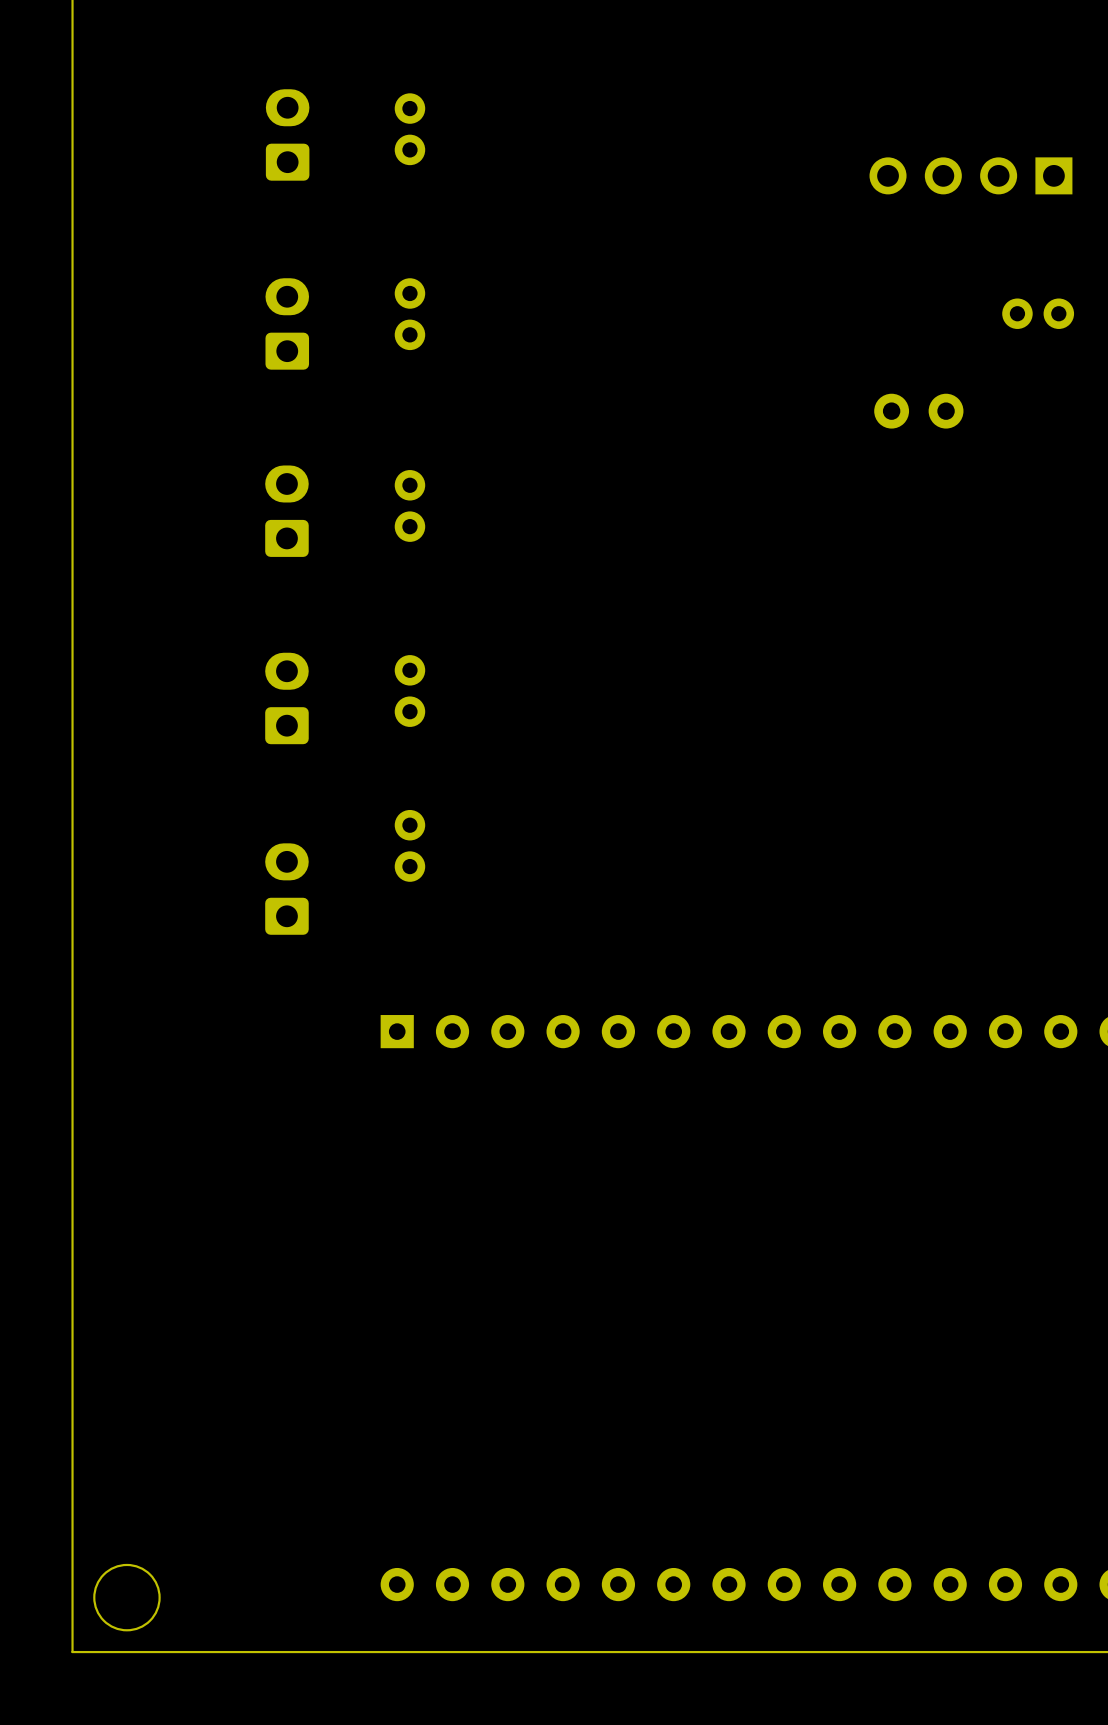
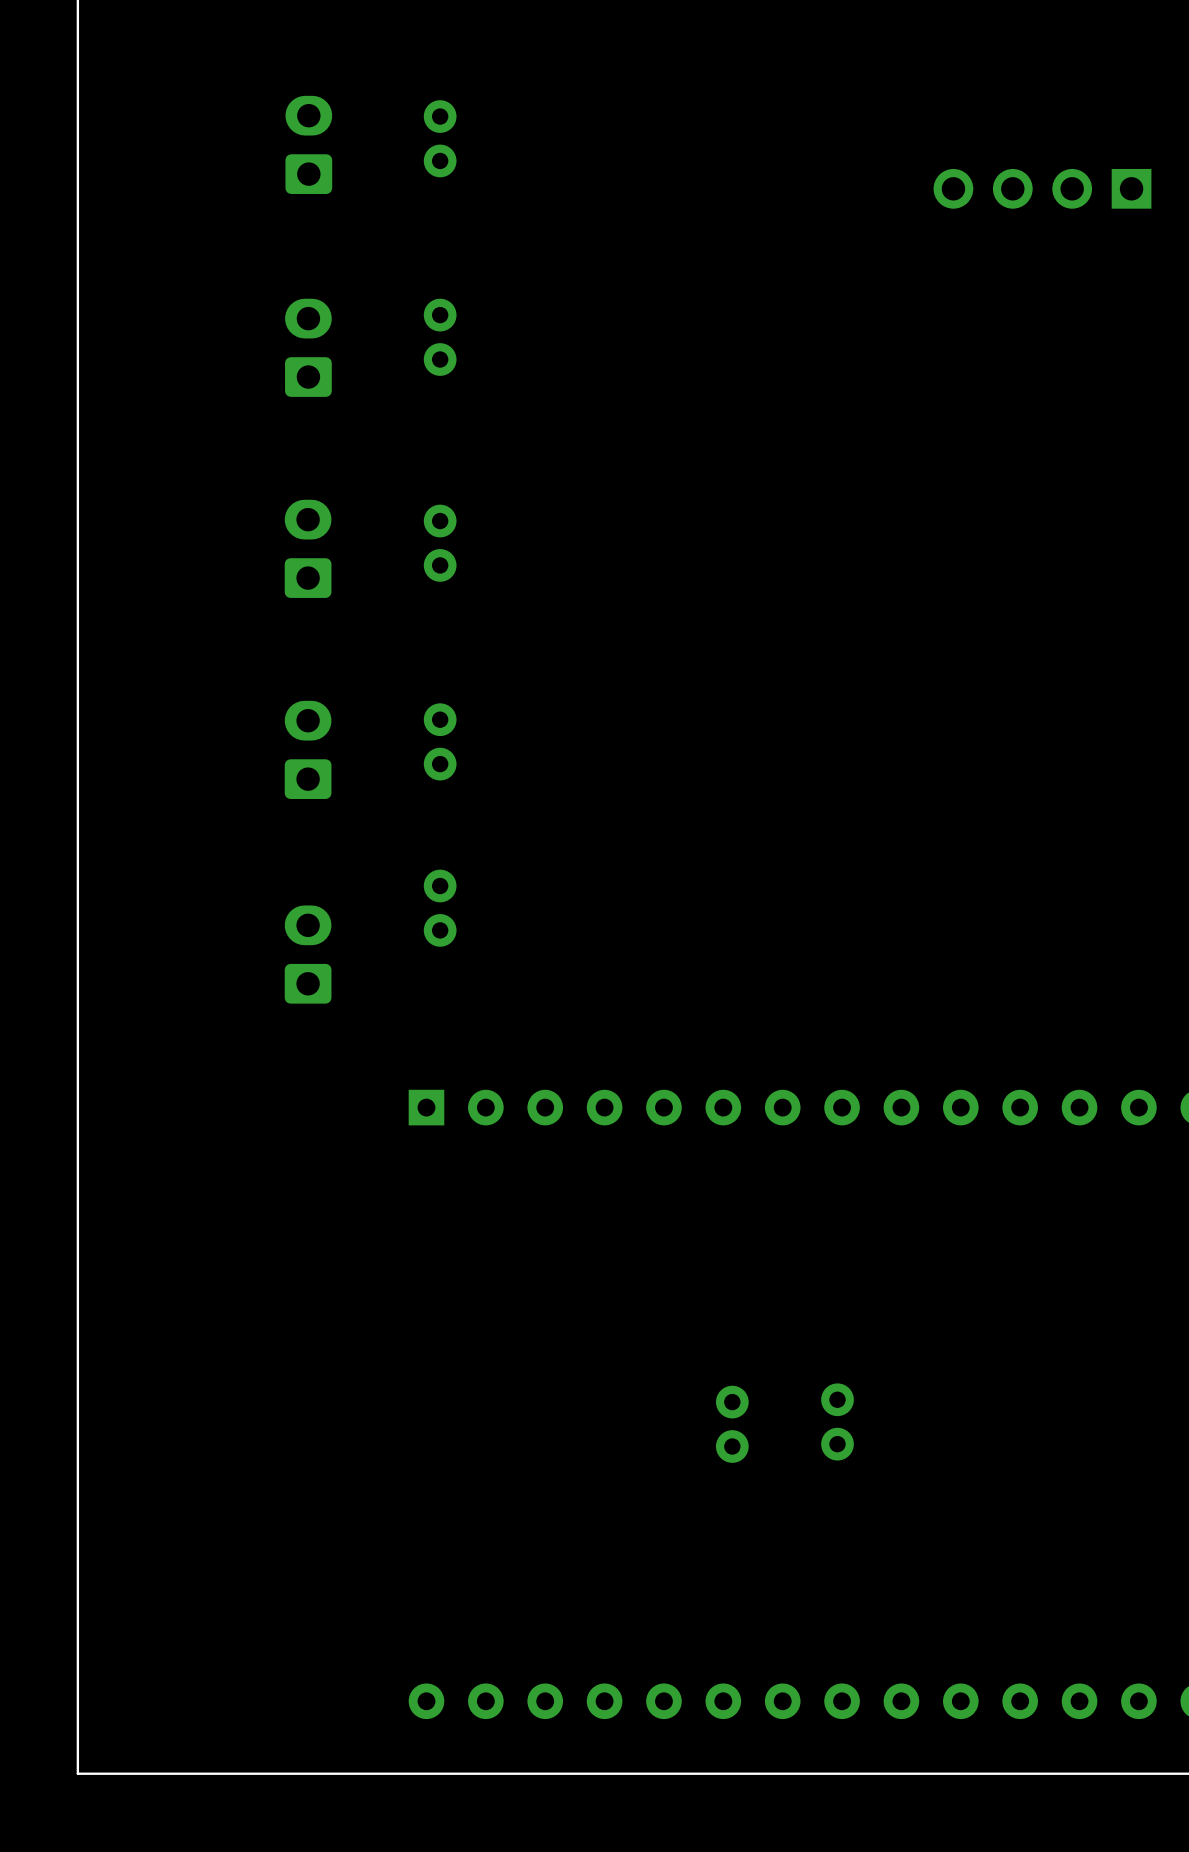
part: (1038, 313) -> none
part: (918, 411) -> none
part: none -> (837, 1421)
part: none -> (732, 1424)
round board edge: [93, 1563, 161, 1632] -> none

